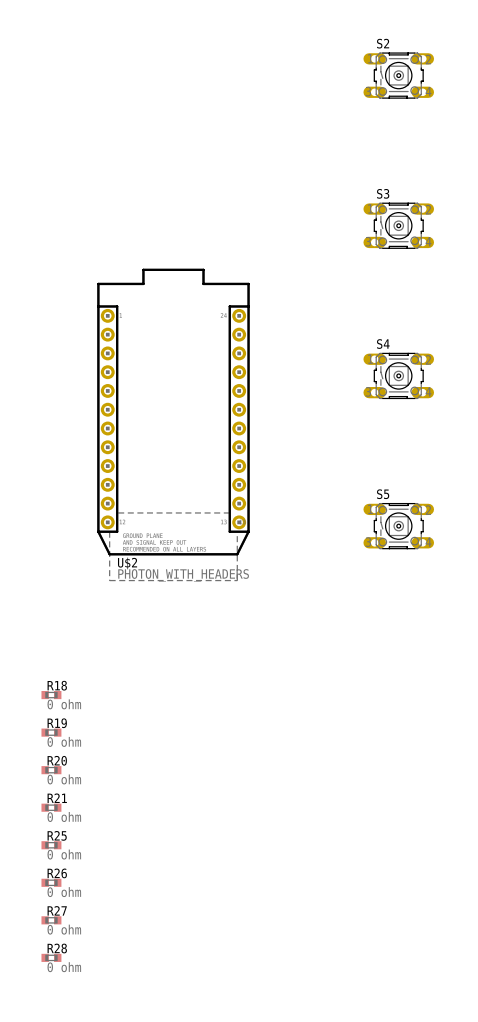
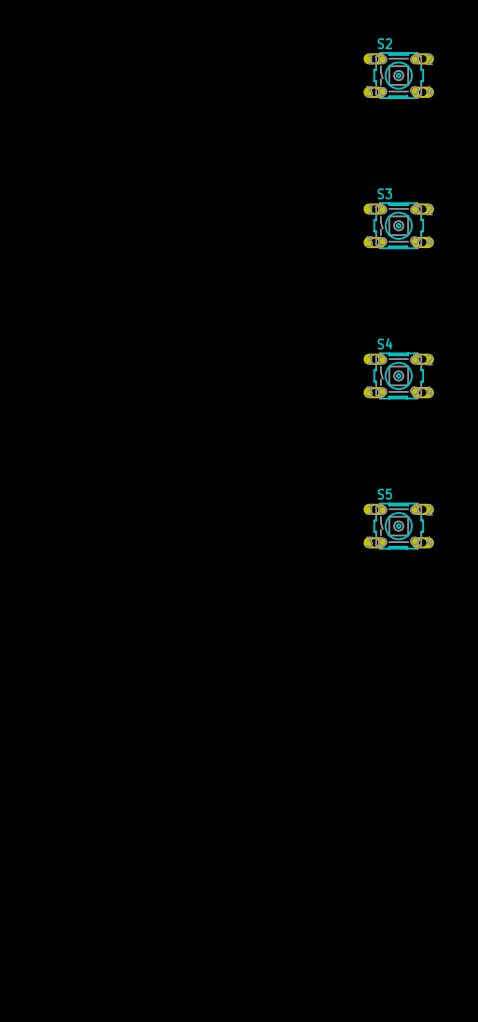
U$2: PHOTON_WITH_HEADERS (173, 424) -> none
R18: 0 ohm (51, 695) -> none
R19: 0 ohm (51, 732) -> none
R20: 0 ohm (51, 770) -> none
R21: 0 ohm (51, 807) -> none
R25: 0 ohm (51, 845) -> none
R26: 0 ohm (51, 882) -> none
R27: 0 ohm (51, 920) -> none
R28: 0 ohm (51, 957) -> none

